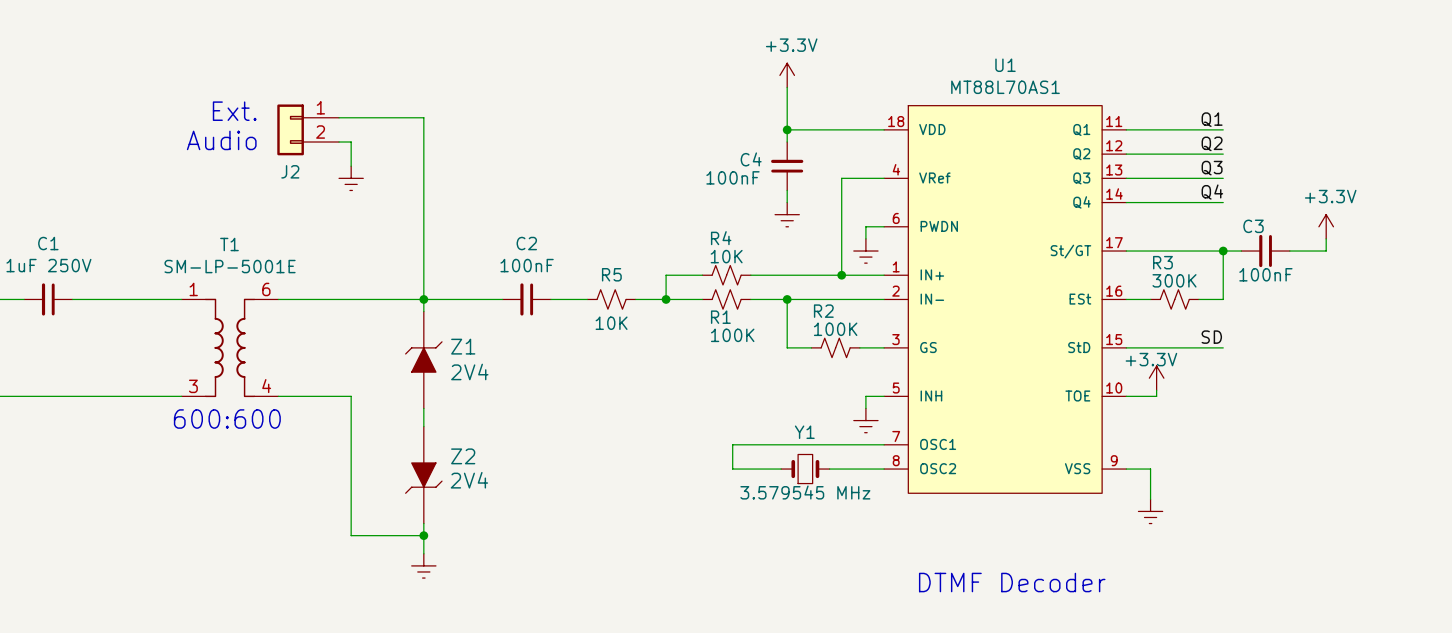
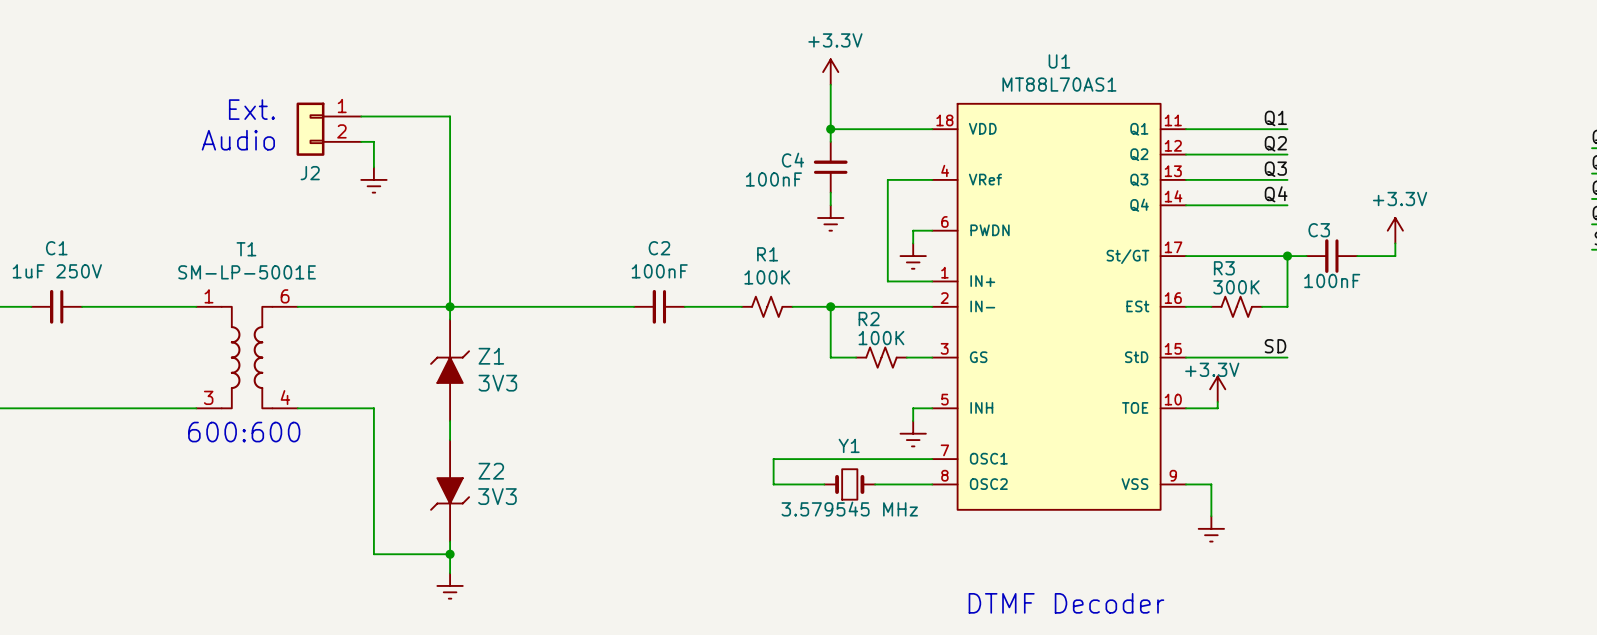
wire: (702, 275) (666, 275) (666, 299) -> none
R4: 10K (726, 275) -> none
wire: (750, 275) (841, 275) -> none
junction: (841, 275) -> none
C2 position: (526, 299) -> (659, 306)
R5: 10K (611, 299) -> none
junction: (666, 299) -> none
R1 name position: R1 (720, 317) -> R1 (767, 254)
R1 value position: 100K (732, 335) -> 100K (767, 277)
Z1 value: 2V4 (469, 371) -> 3V3 (497, 383)
Z2 value: 2V4 (469, 480) -> 3V3 (497, 496)

